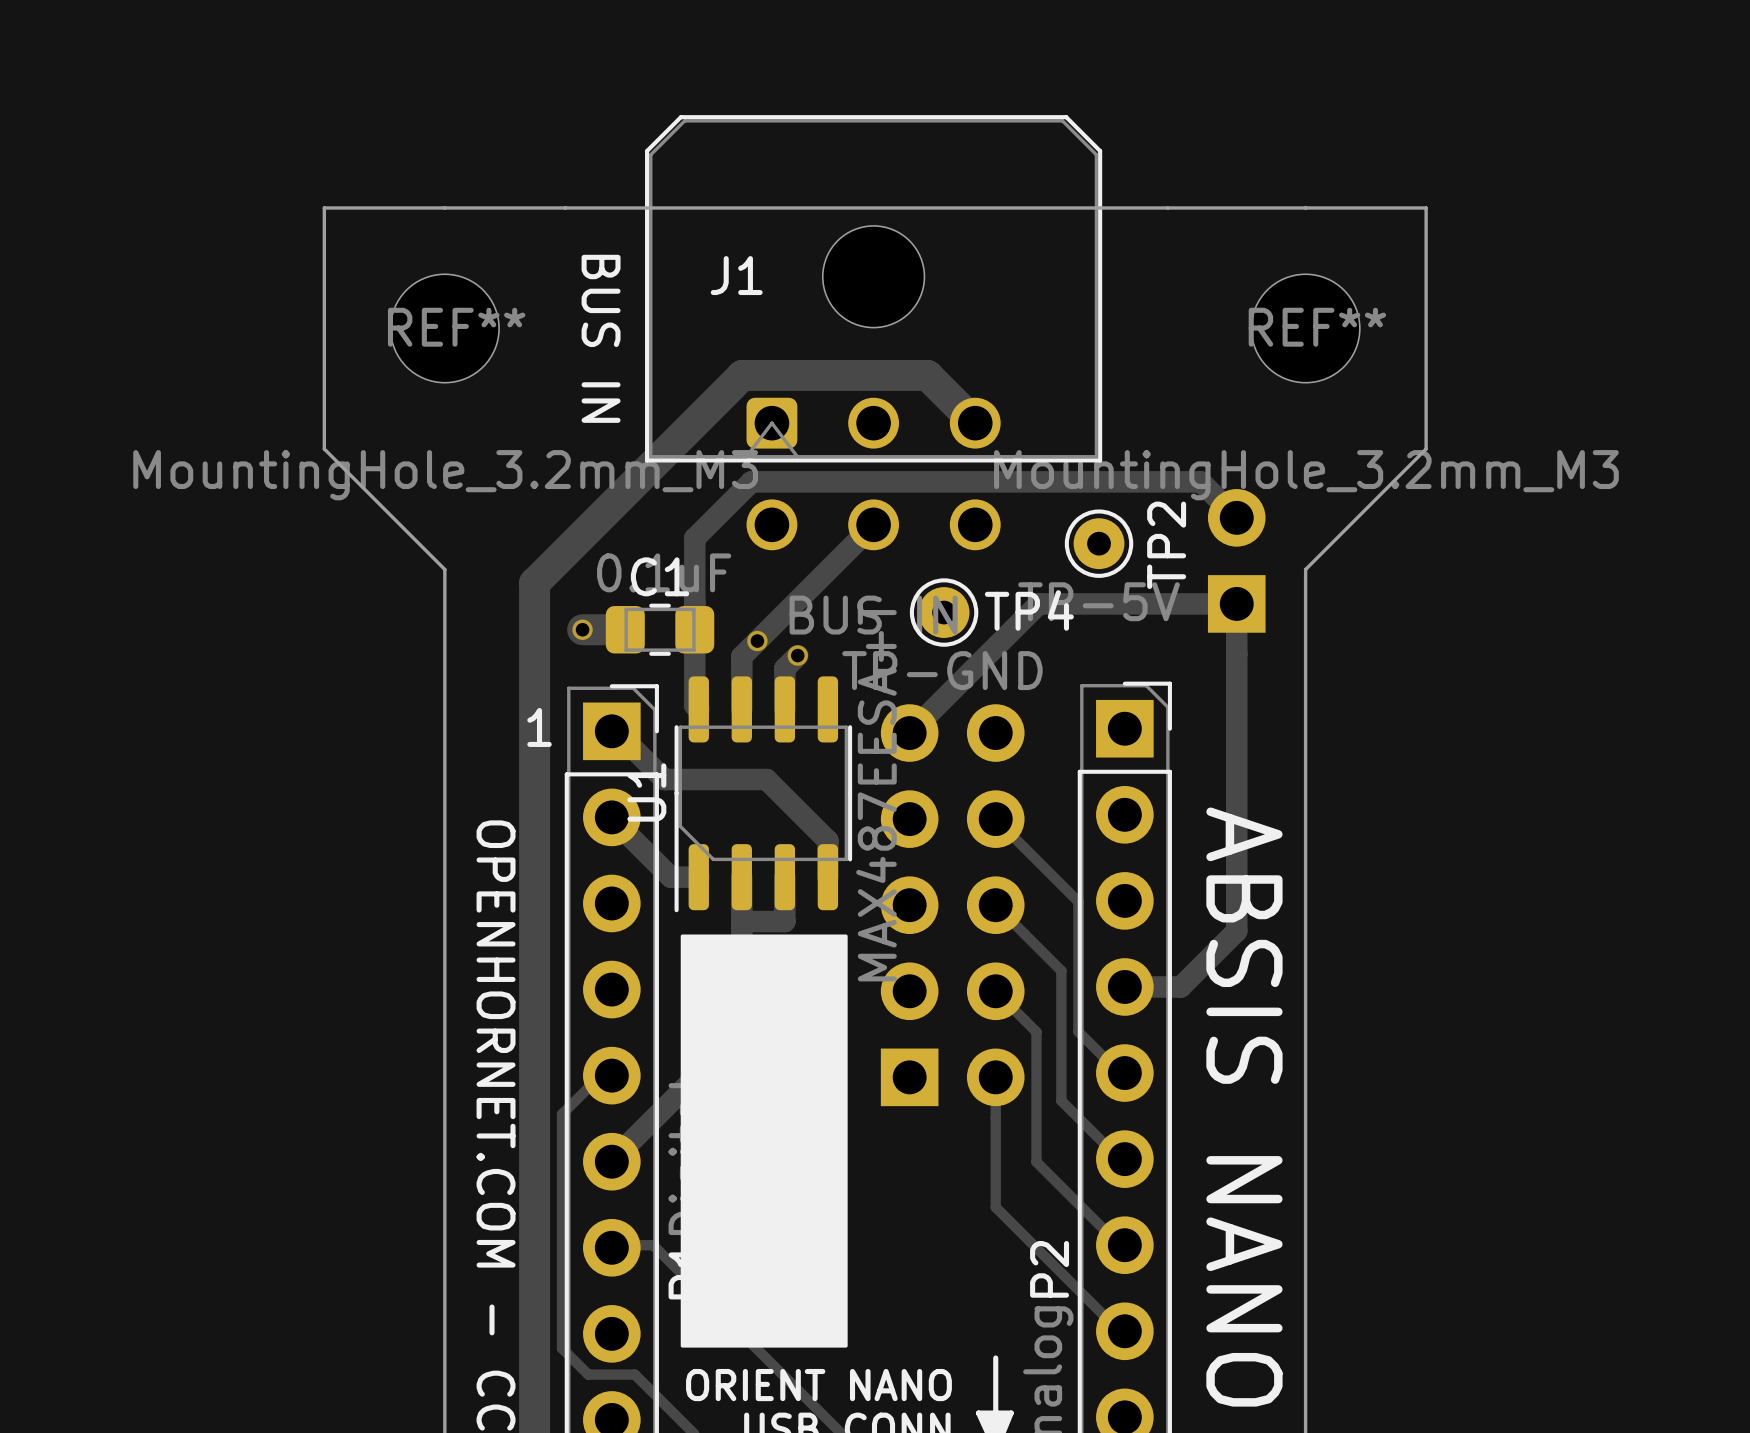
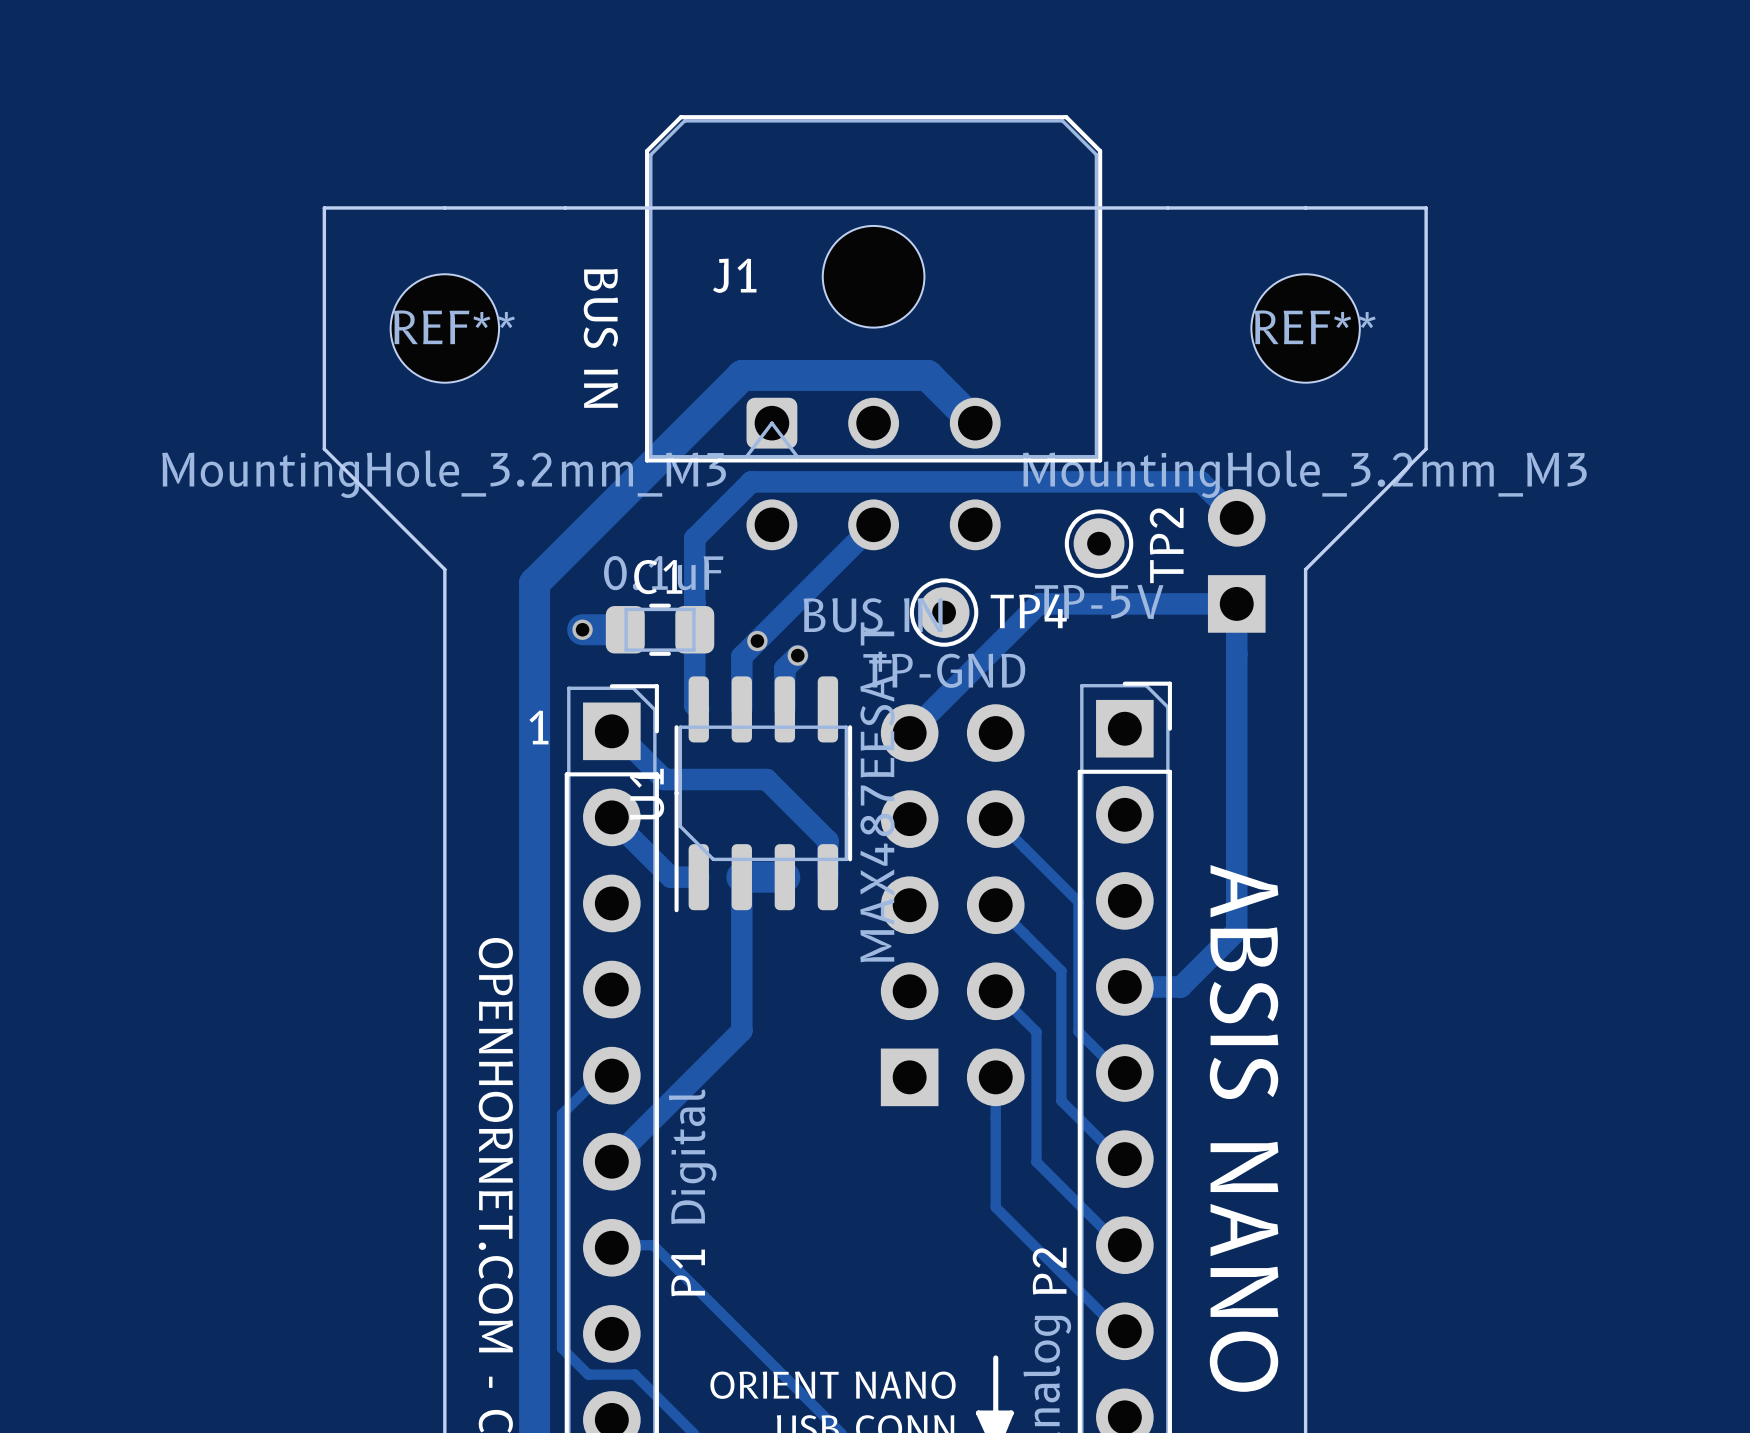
track: (784, 877) (784, 921) (741, 921) -> (784, 877) (741, 877)
drawing: [680, 934, 848, 1348] -> none

